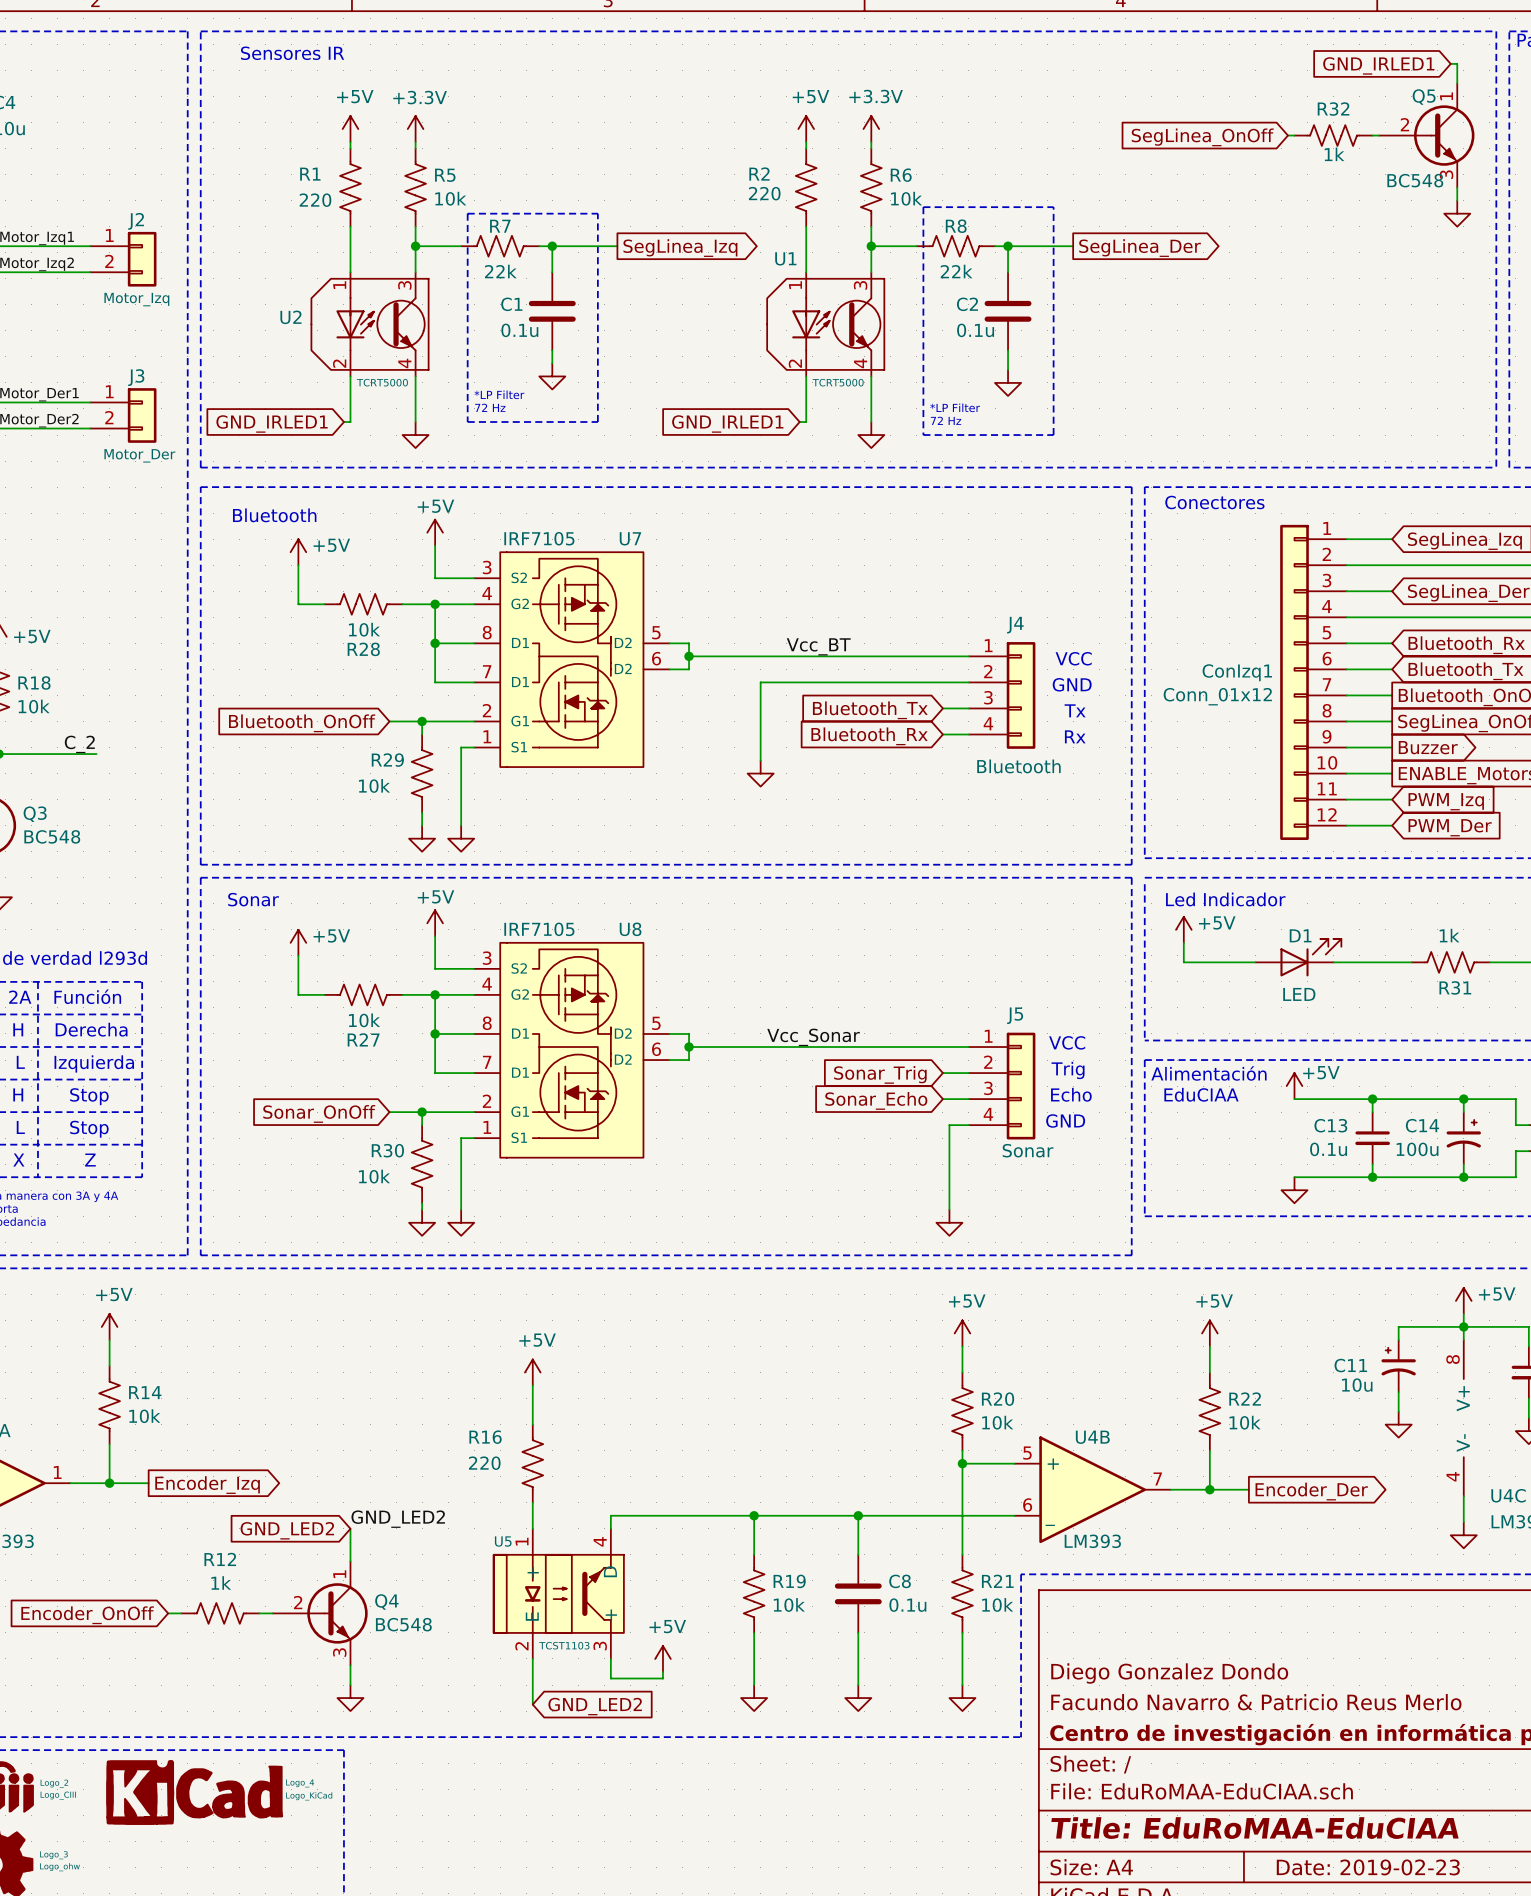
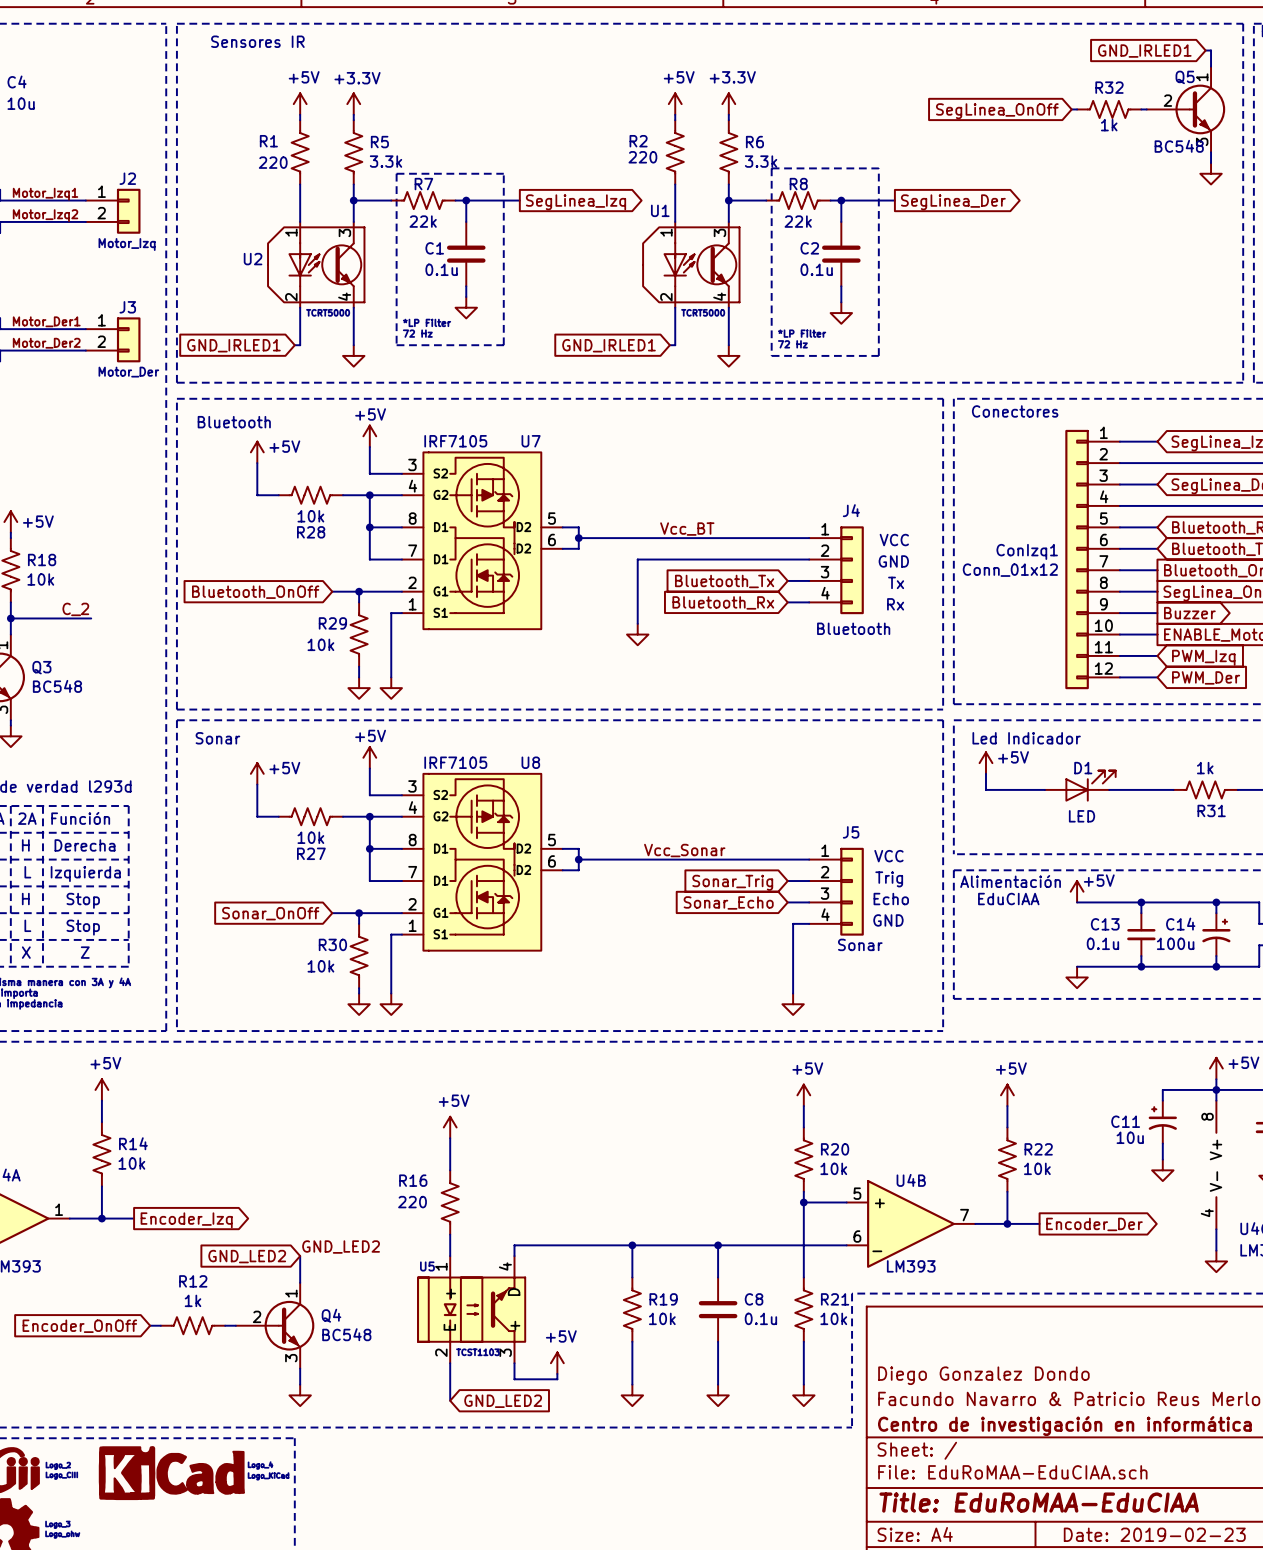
R5 value: 10k (450, 198) -> 3.3k (386, 161)
R6 value: 10k (906, 198) -> 3.3k (761, 161)

